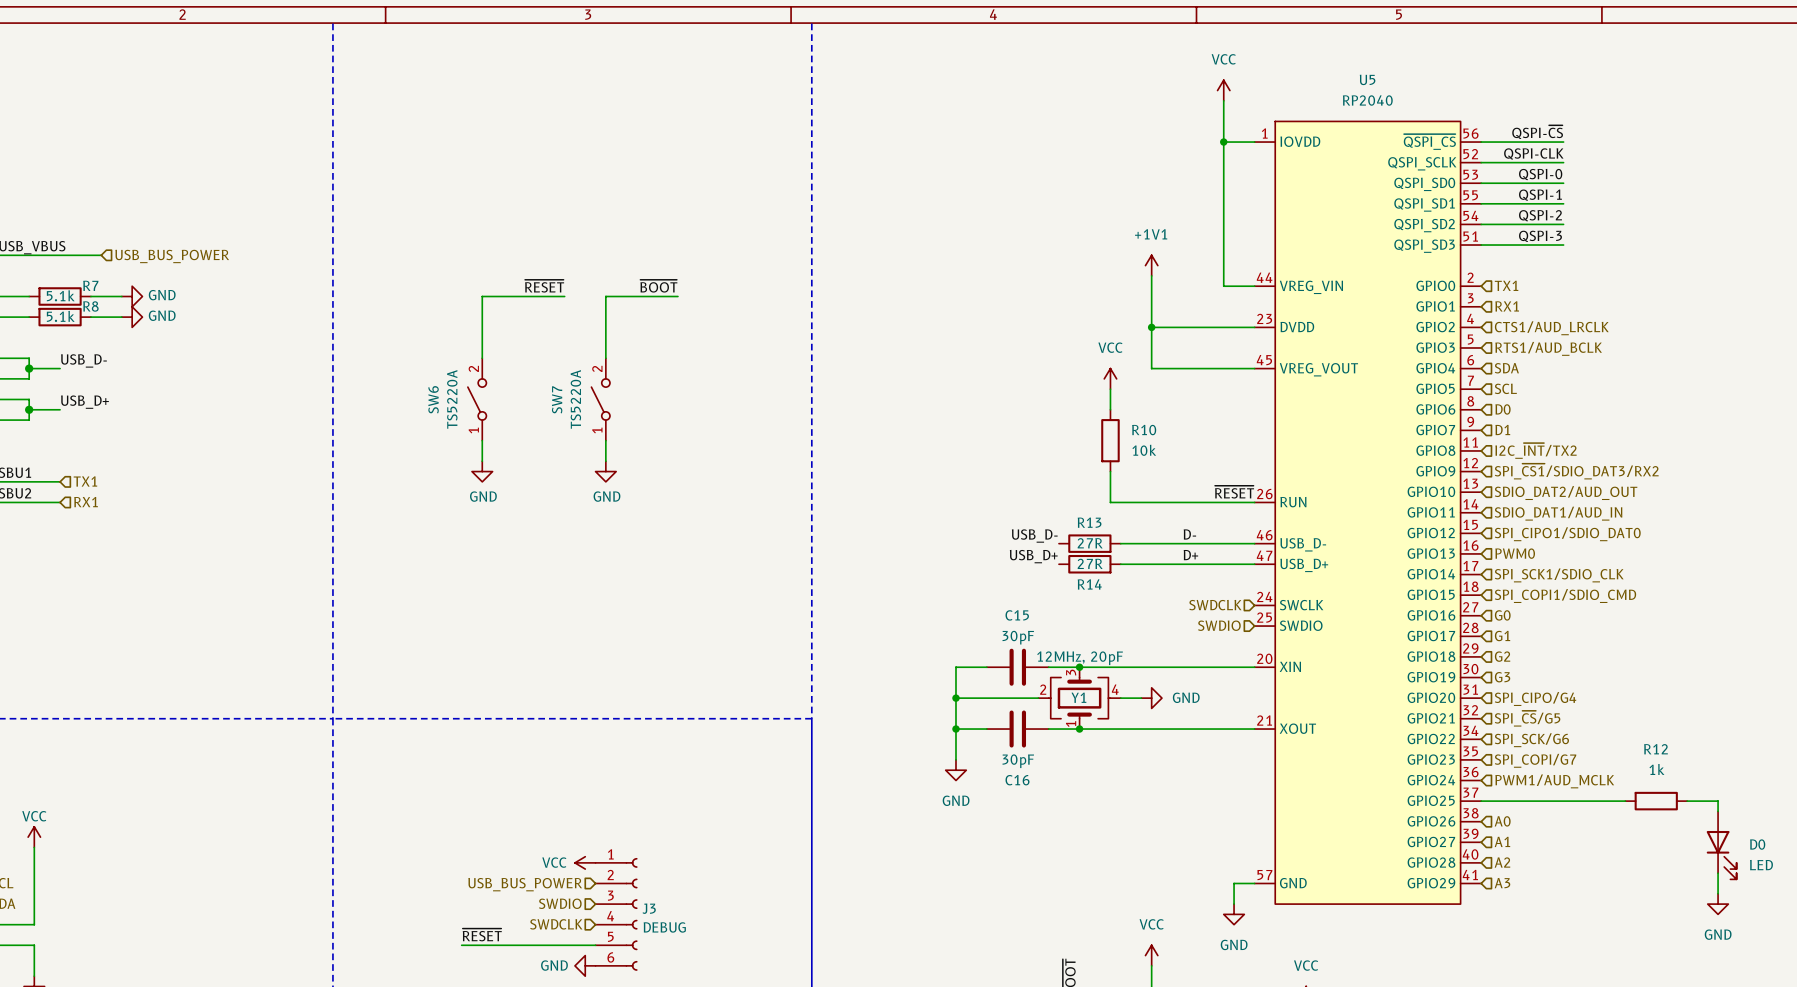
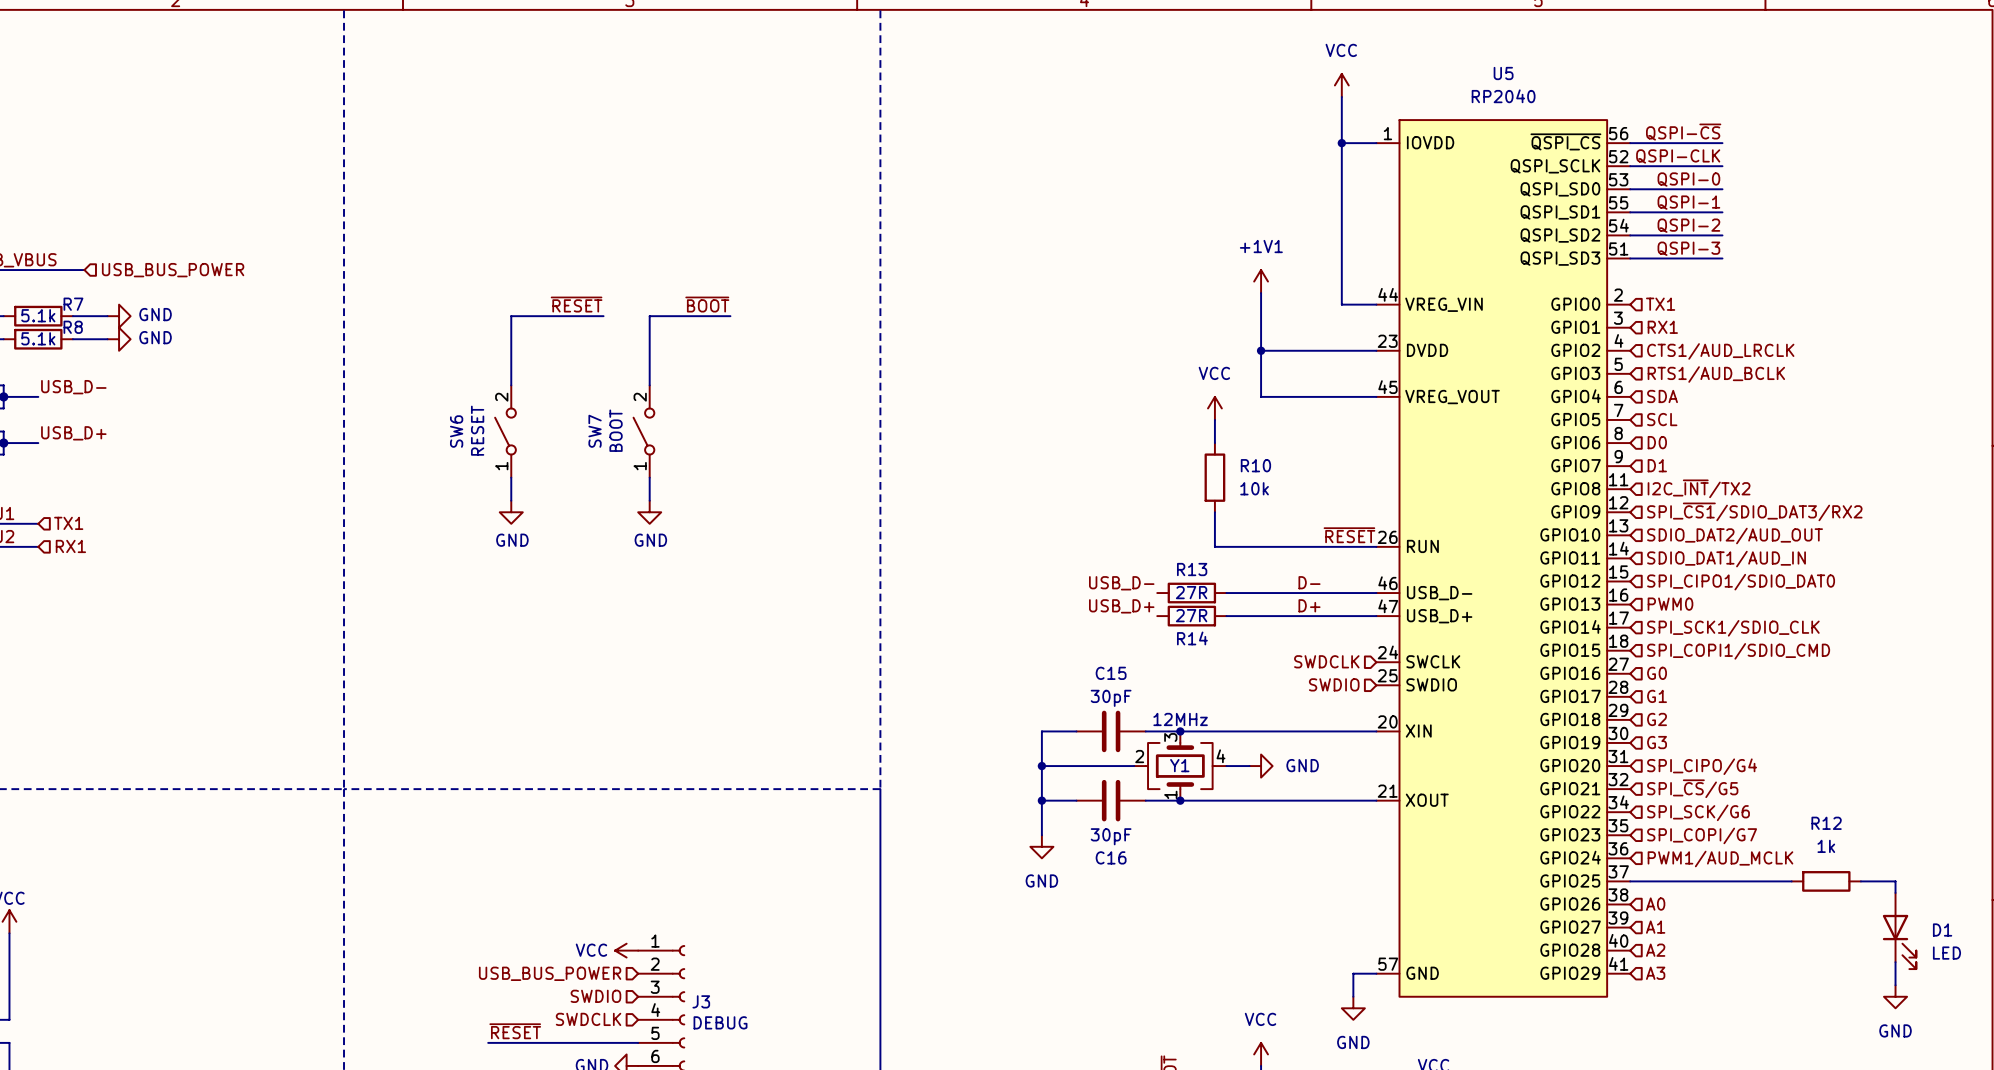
SW6 value: TS5220A (452, 399) -> RESET (477, 430)
SW7 value: TS5220A (575, 399) -> BOOT (616, 430)
Y1 value: 12MHz, 20pF (1080, 658) -> 12MHz (1180, 719)
D0 name: D0 (1757, 844) -> D1 (1942, 930)

